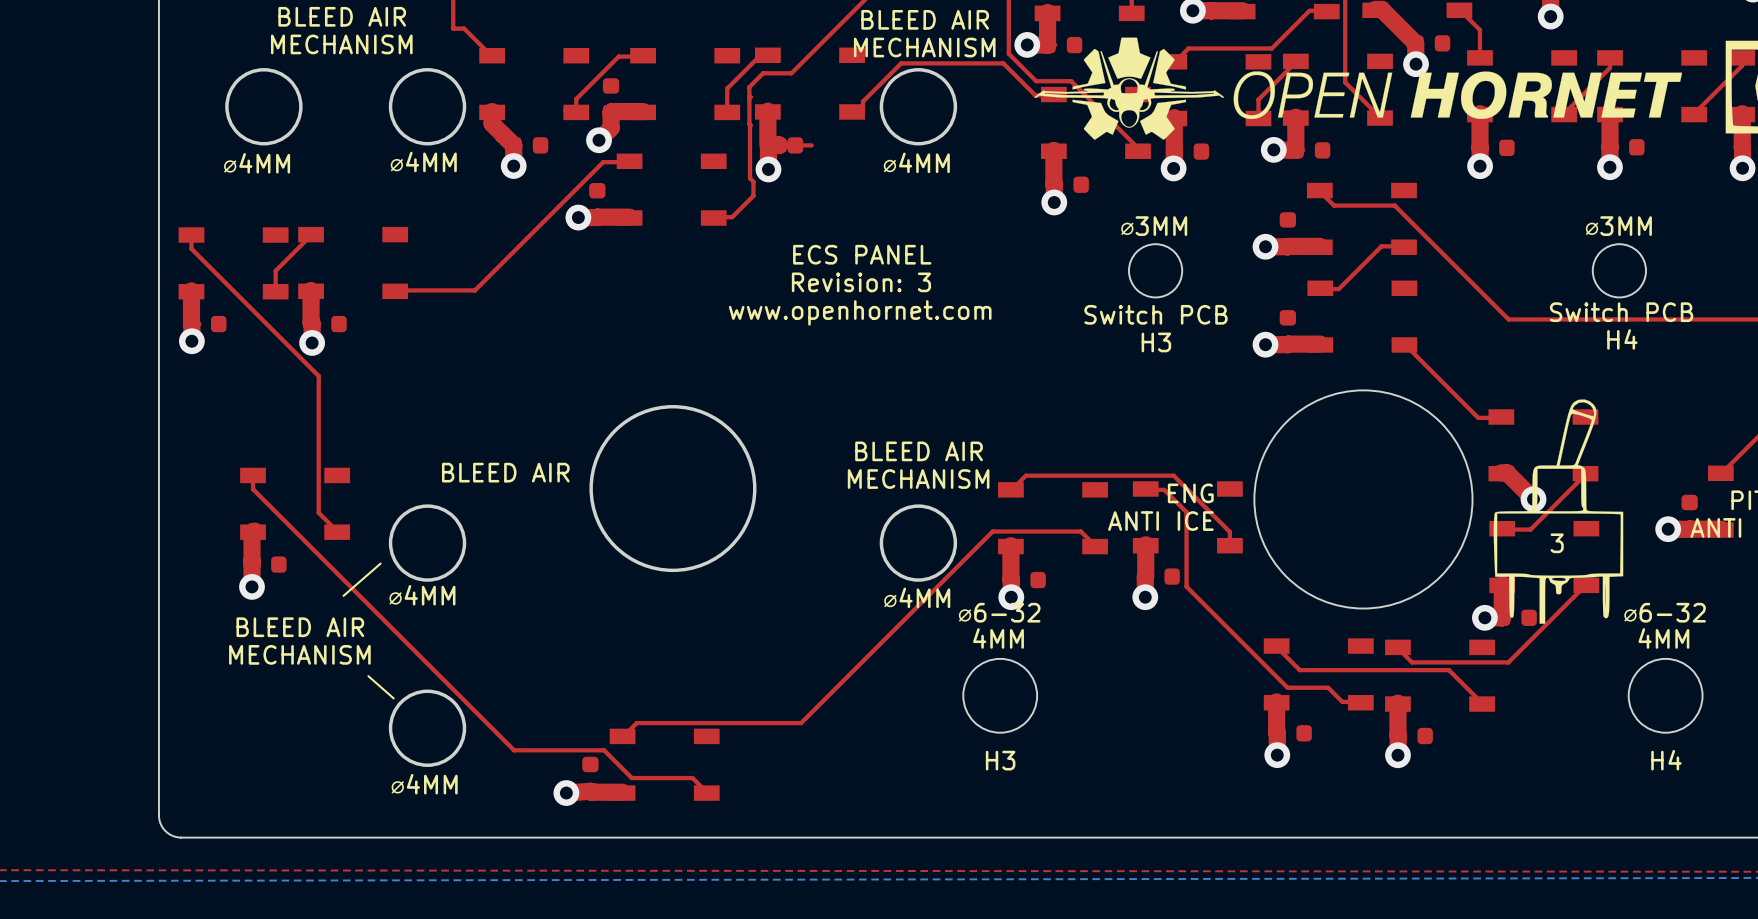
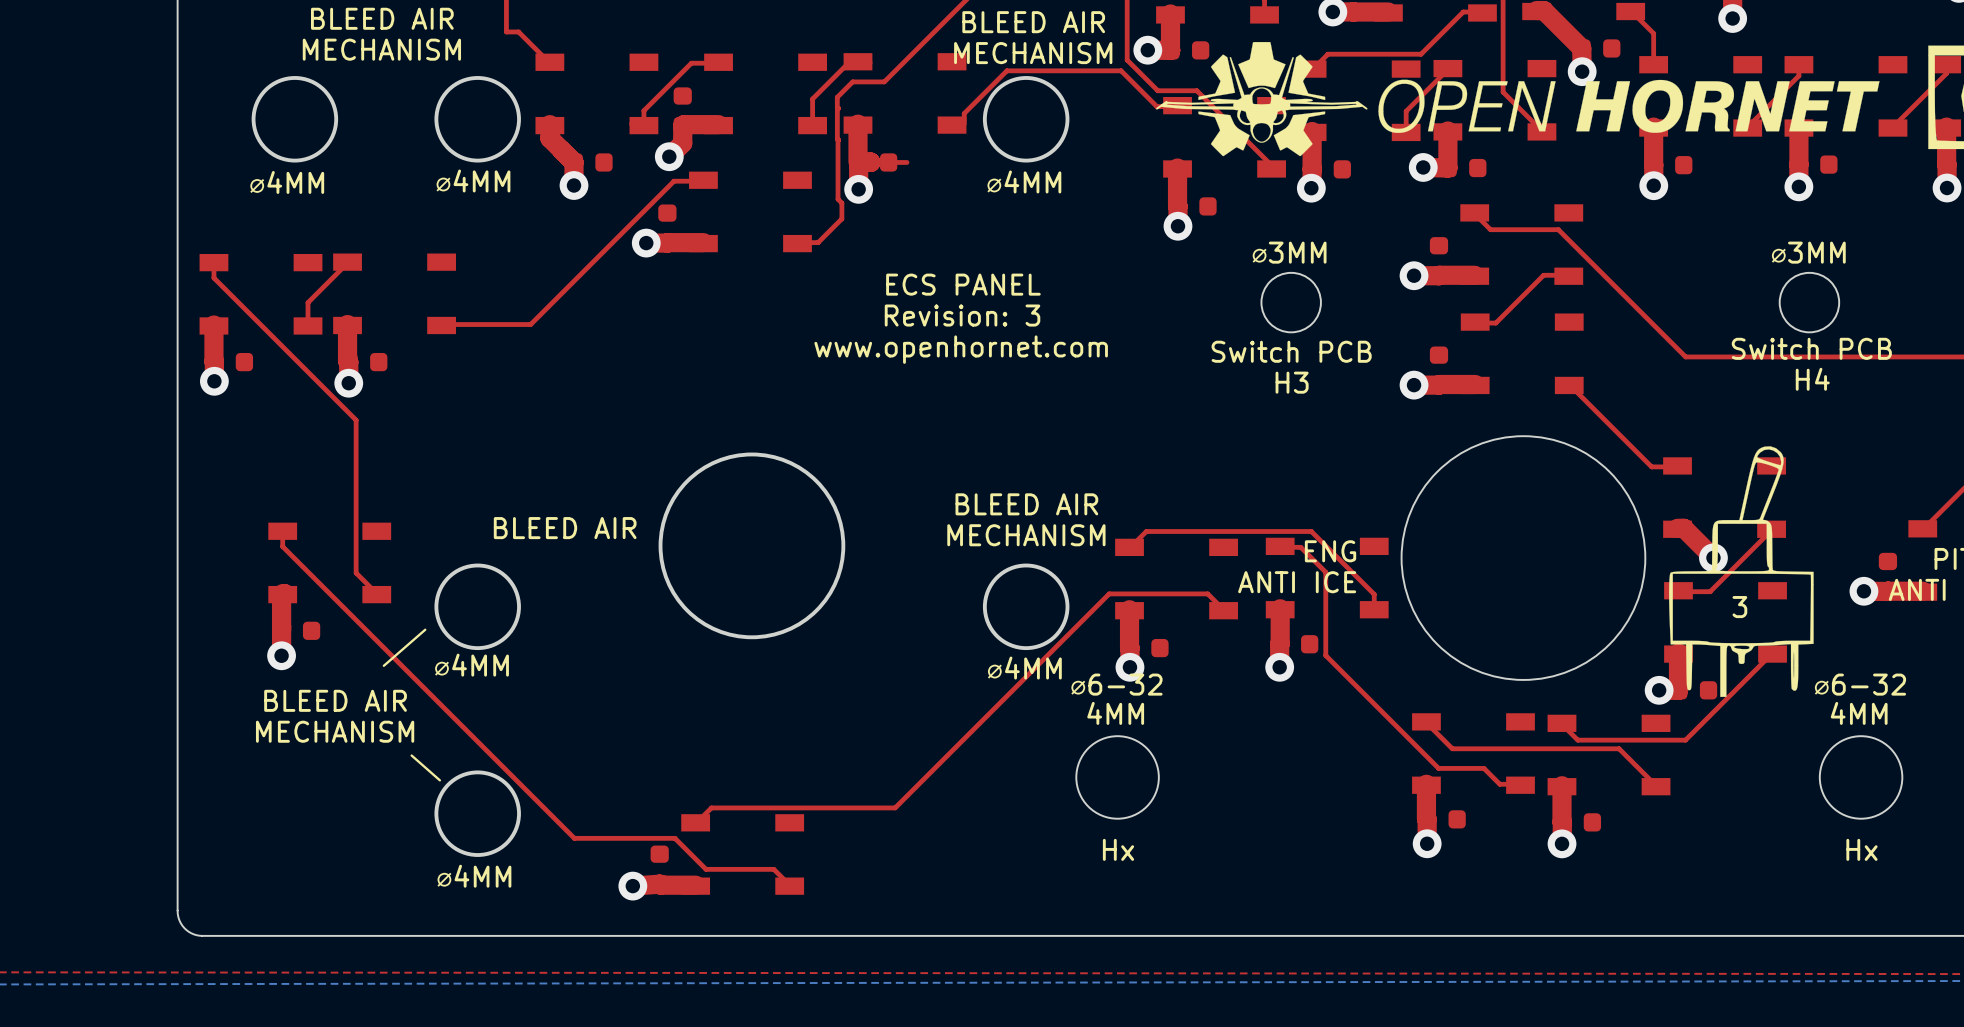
part text: H3 (1000, 760) -> Hx (1118, 849)
part text: H4 (1666, 760) -> Hx (1861, 849)

